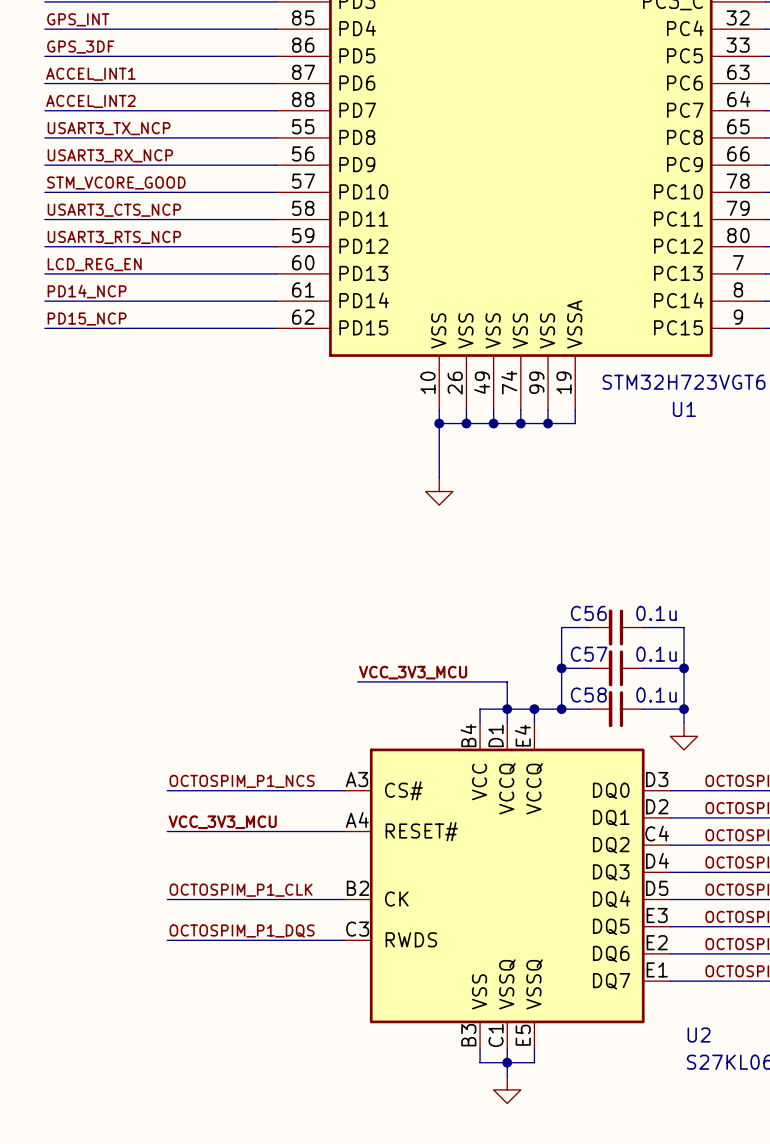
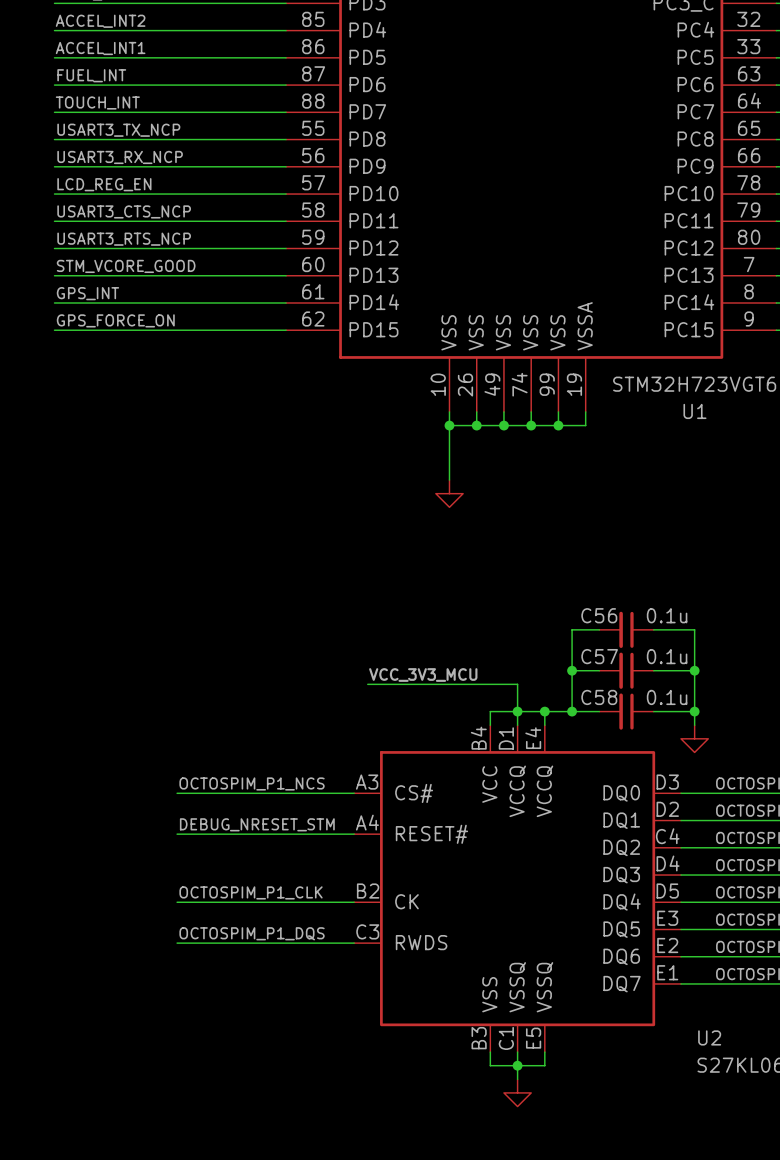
label: GPS_INT (78, 19) -> ACCEL_INT2 (100, 21)
label: GPS_3DF (80, 47) -> ACCEL_INT1 (100, 48)
label: ACCEL_INT1 (90, 74) -> FUEL_INT (91, 75)
label: ACCEL_INT2 (90, 101) -> TOUCH_INT (97, 102)
label: STM_VCORE_GOOD (116, 183) -> LCD_REG_EN (104, 184)
label: LCD_REG_EN (94, 264) -> STM_VCORE_GOOD (126, 266)
label: PD14_NCP (87, 291) -> GPS_INT (87, 293)
label: PD15_NCP (87, 319) -> GPS_FORCE_ON (115, 320)
label: VCC_3V3_MCU (222, 822) -> DEBUG_NRESET_STM (257, 824)

